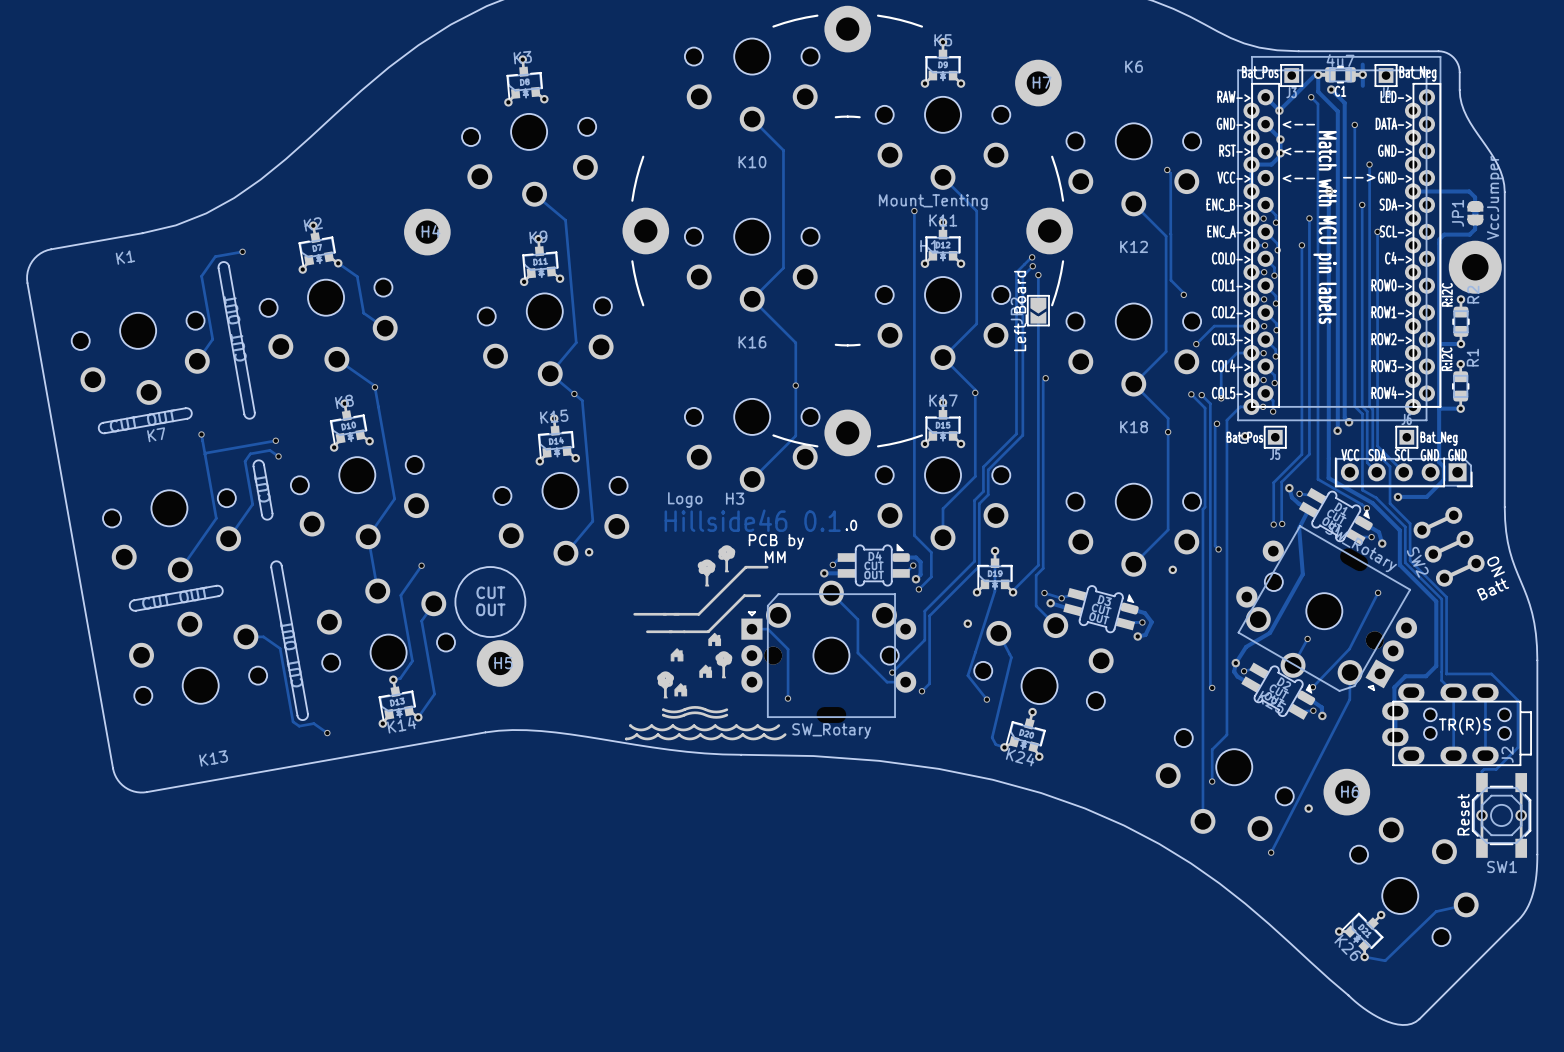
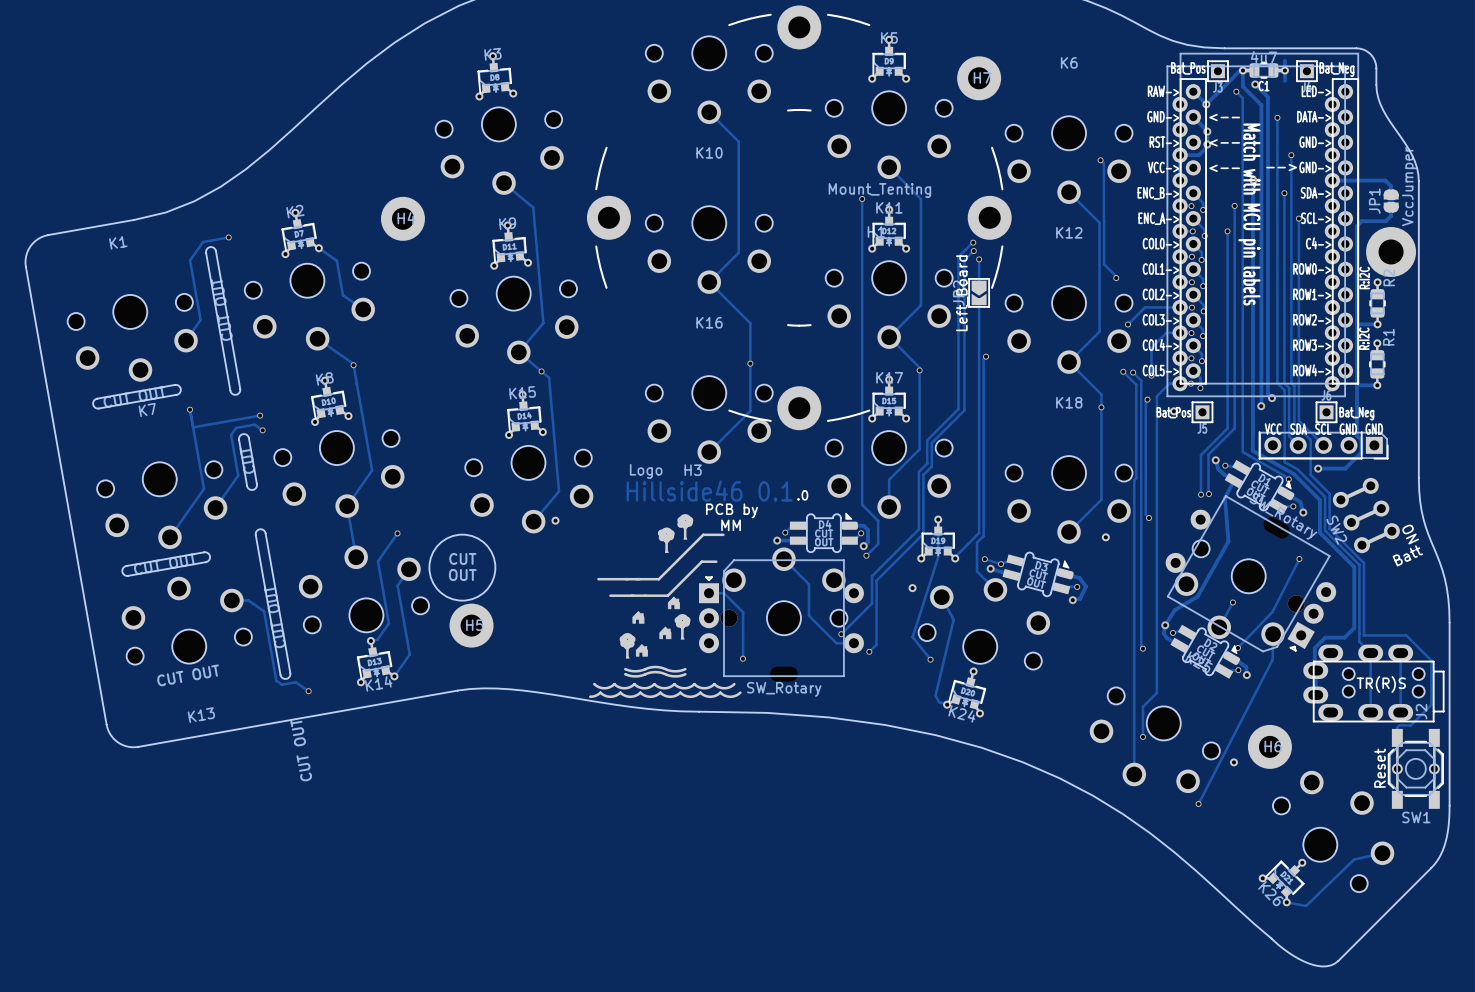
text: none -> CUT OUT (188, 675)
text: none -> CUT OUT (301, 750)

